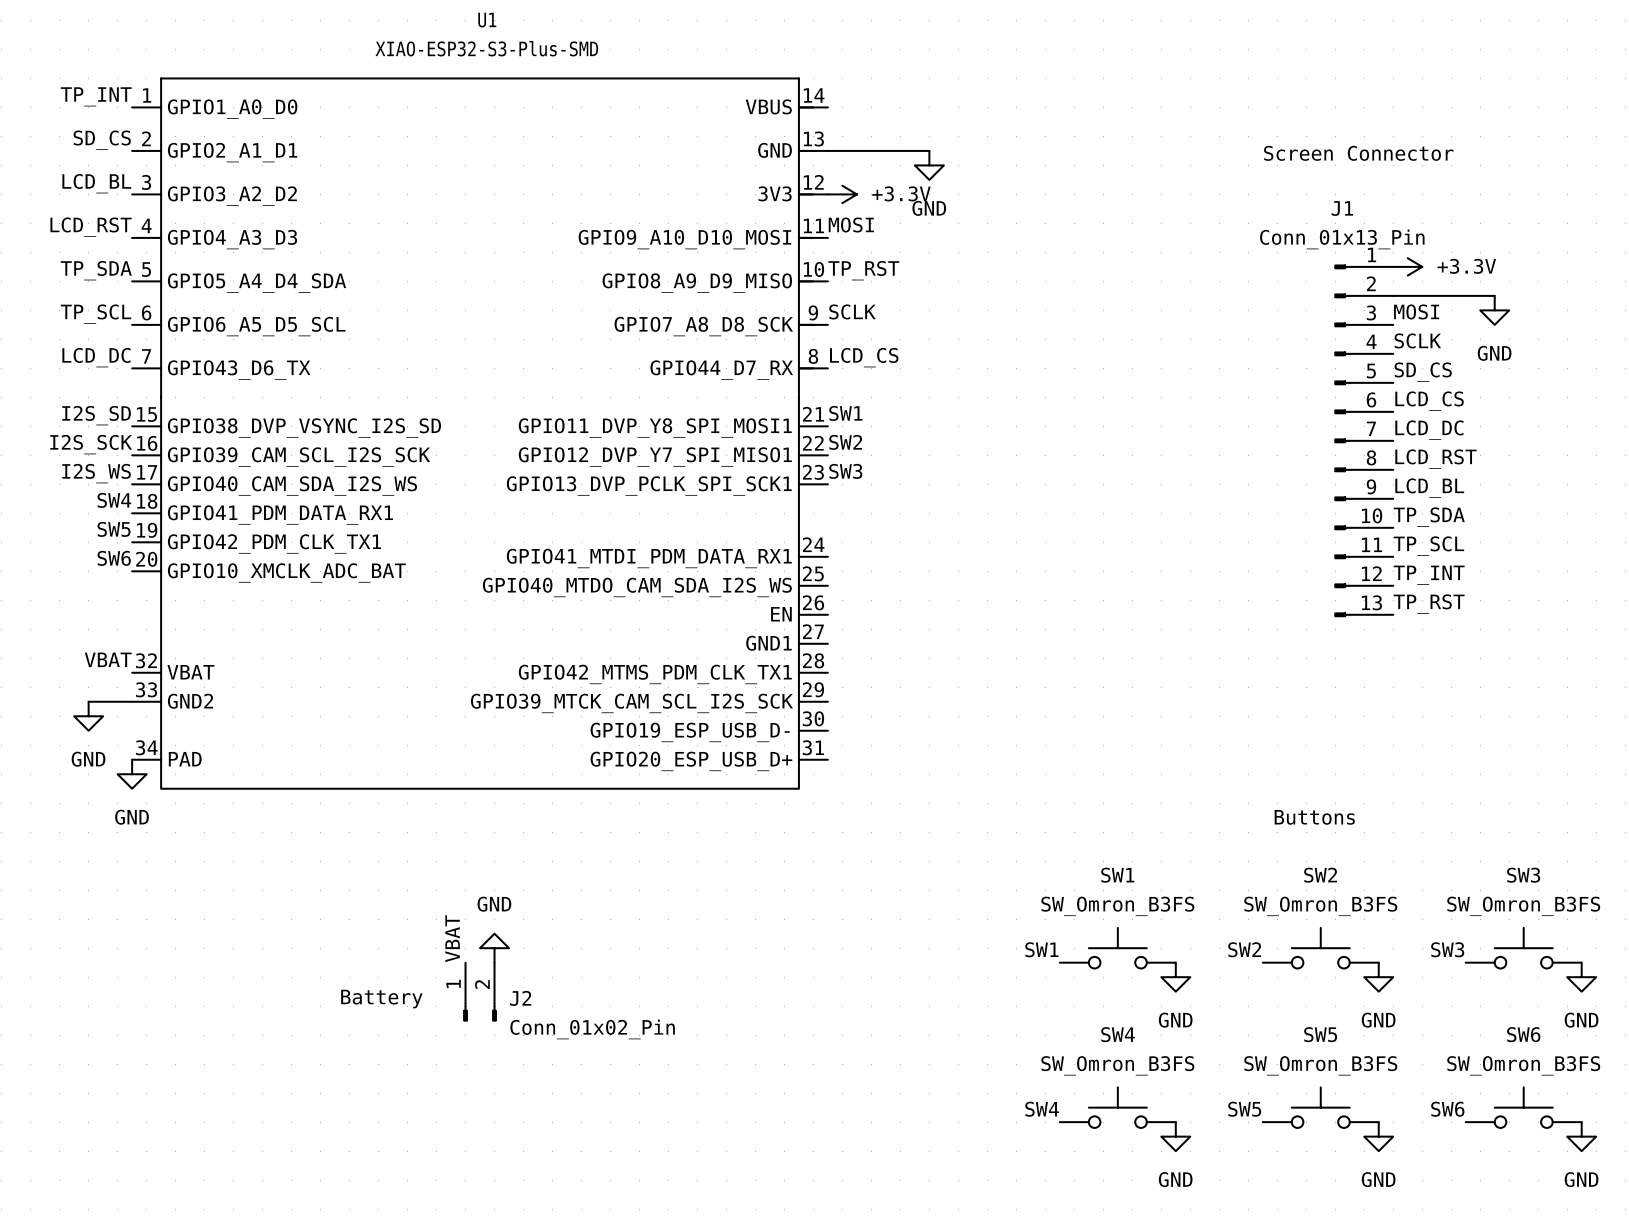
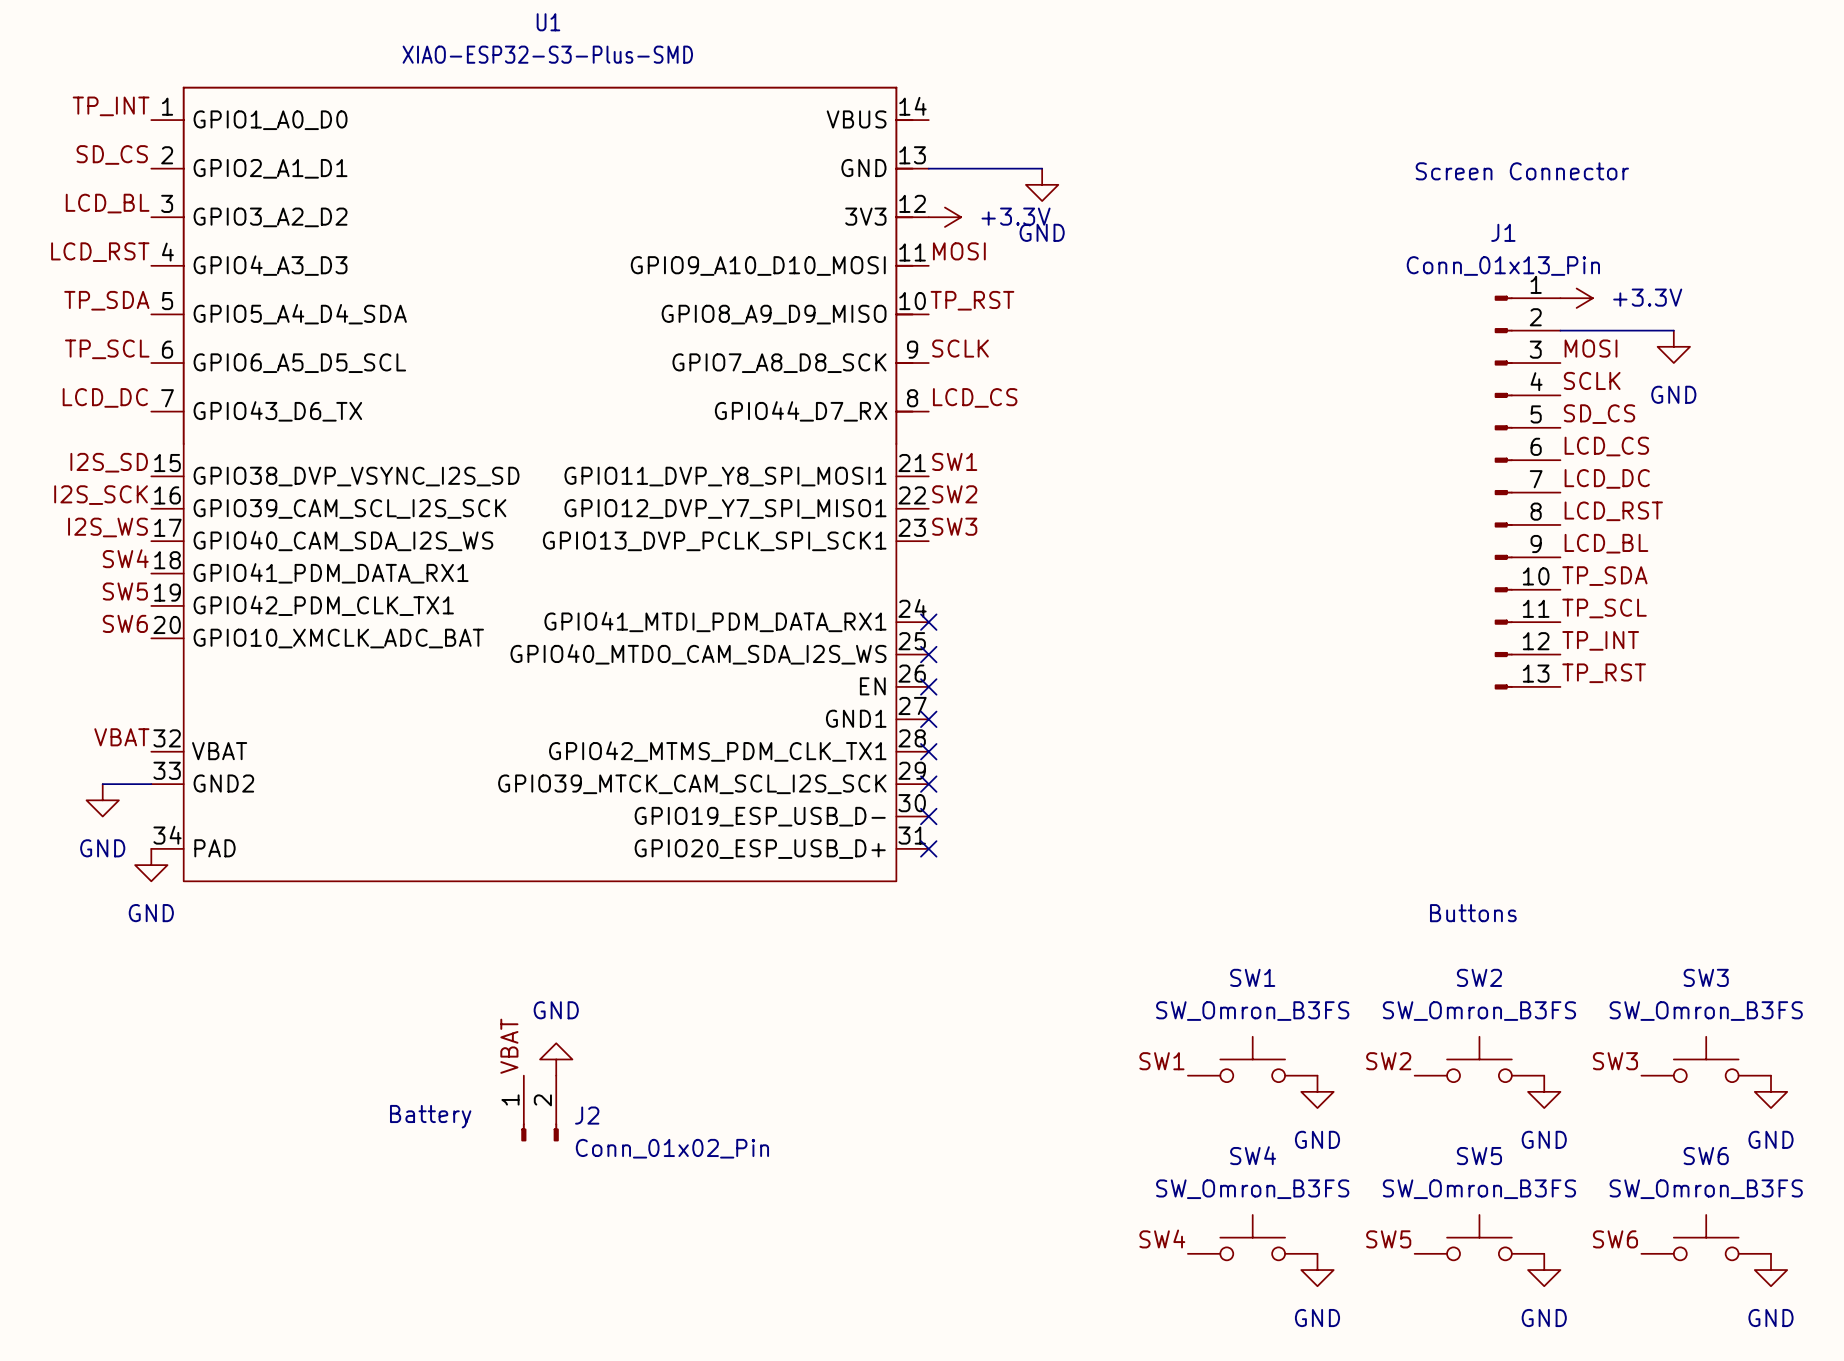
no-connect mark: none -> (928, 622)
no-connect mark: none -> (928, 654)
no-connect mark: none -> (928, 686)
no-connect mark: none -> (928, 719)
no-connect mark: none -> (928, 751)
no-connect mark: none -> (928, 784)
no-connect mark: none -> (928, 816)
no-connect mark: none -> (928, 848)

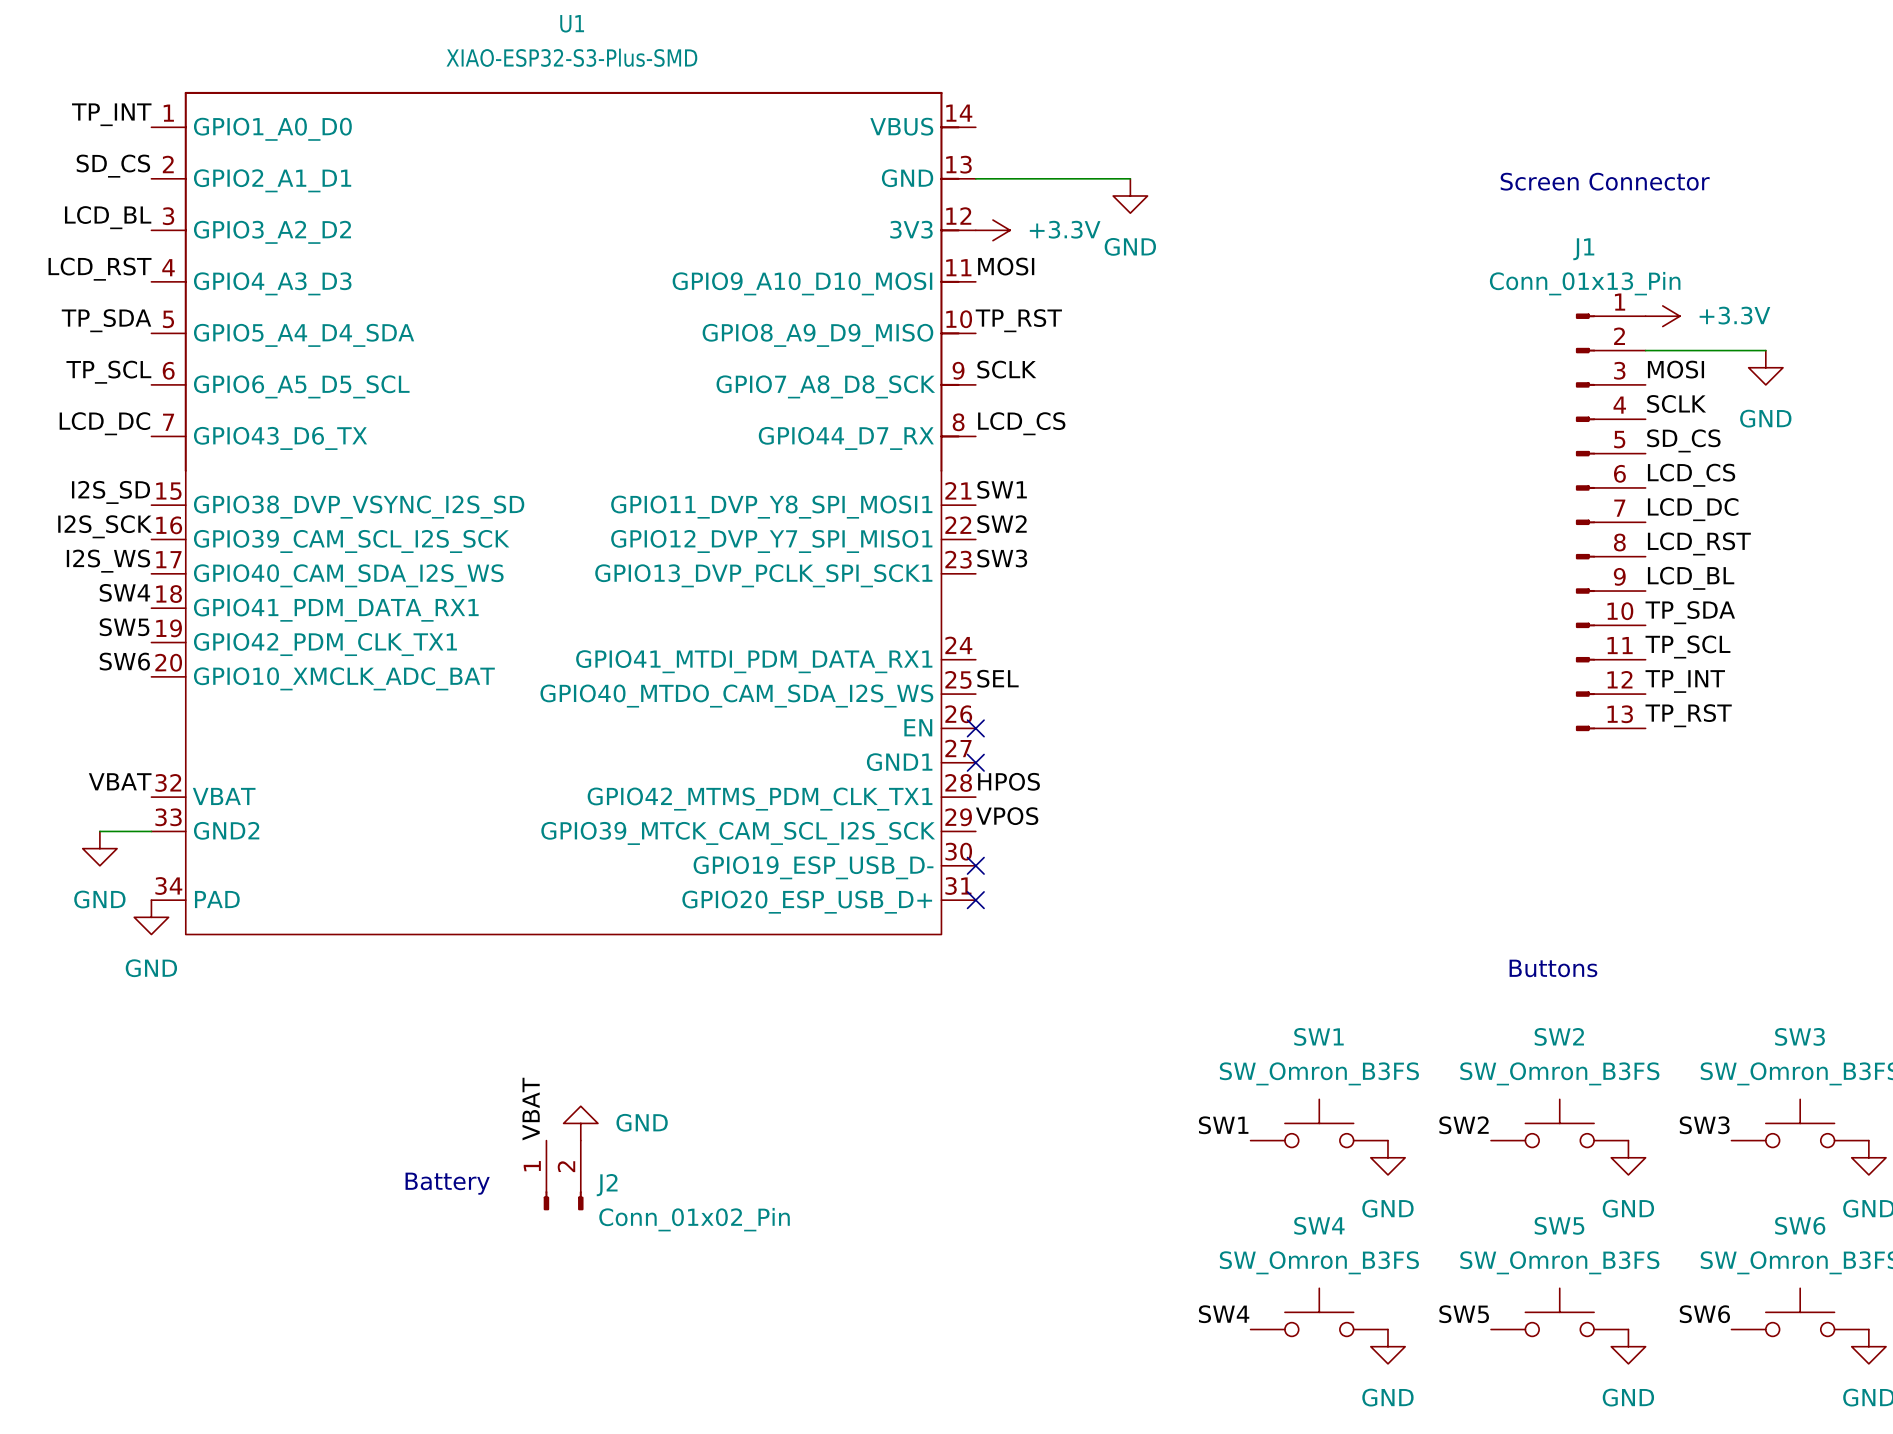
wire: none -> (1096, 178) (1130, 178)
power symbol position: GND (1042, 184) -> GND (1130, 196)
no-connect mark: (928, 622) -> none
label: none -> SEL (997, 678)
no-connect mark: (928, 654) -> none
label: none -> HPOS (1009, 781)
no-connect mark: (928, 751) -> none
label: none -> VPOS (1007, 816)
no-connect mark: (928, 784) -> none
power symbol text position: GND (556, 1010) -> GND (642, 1122)

